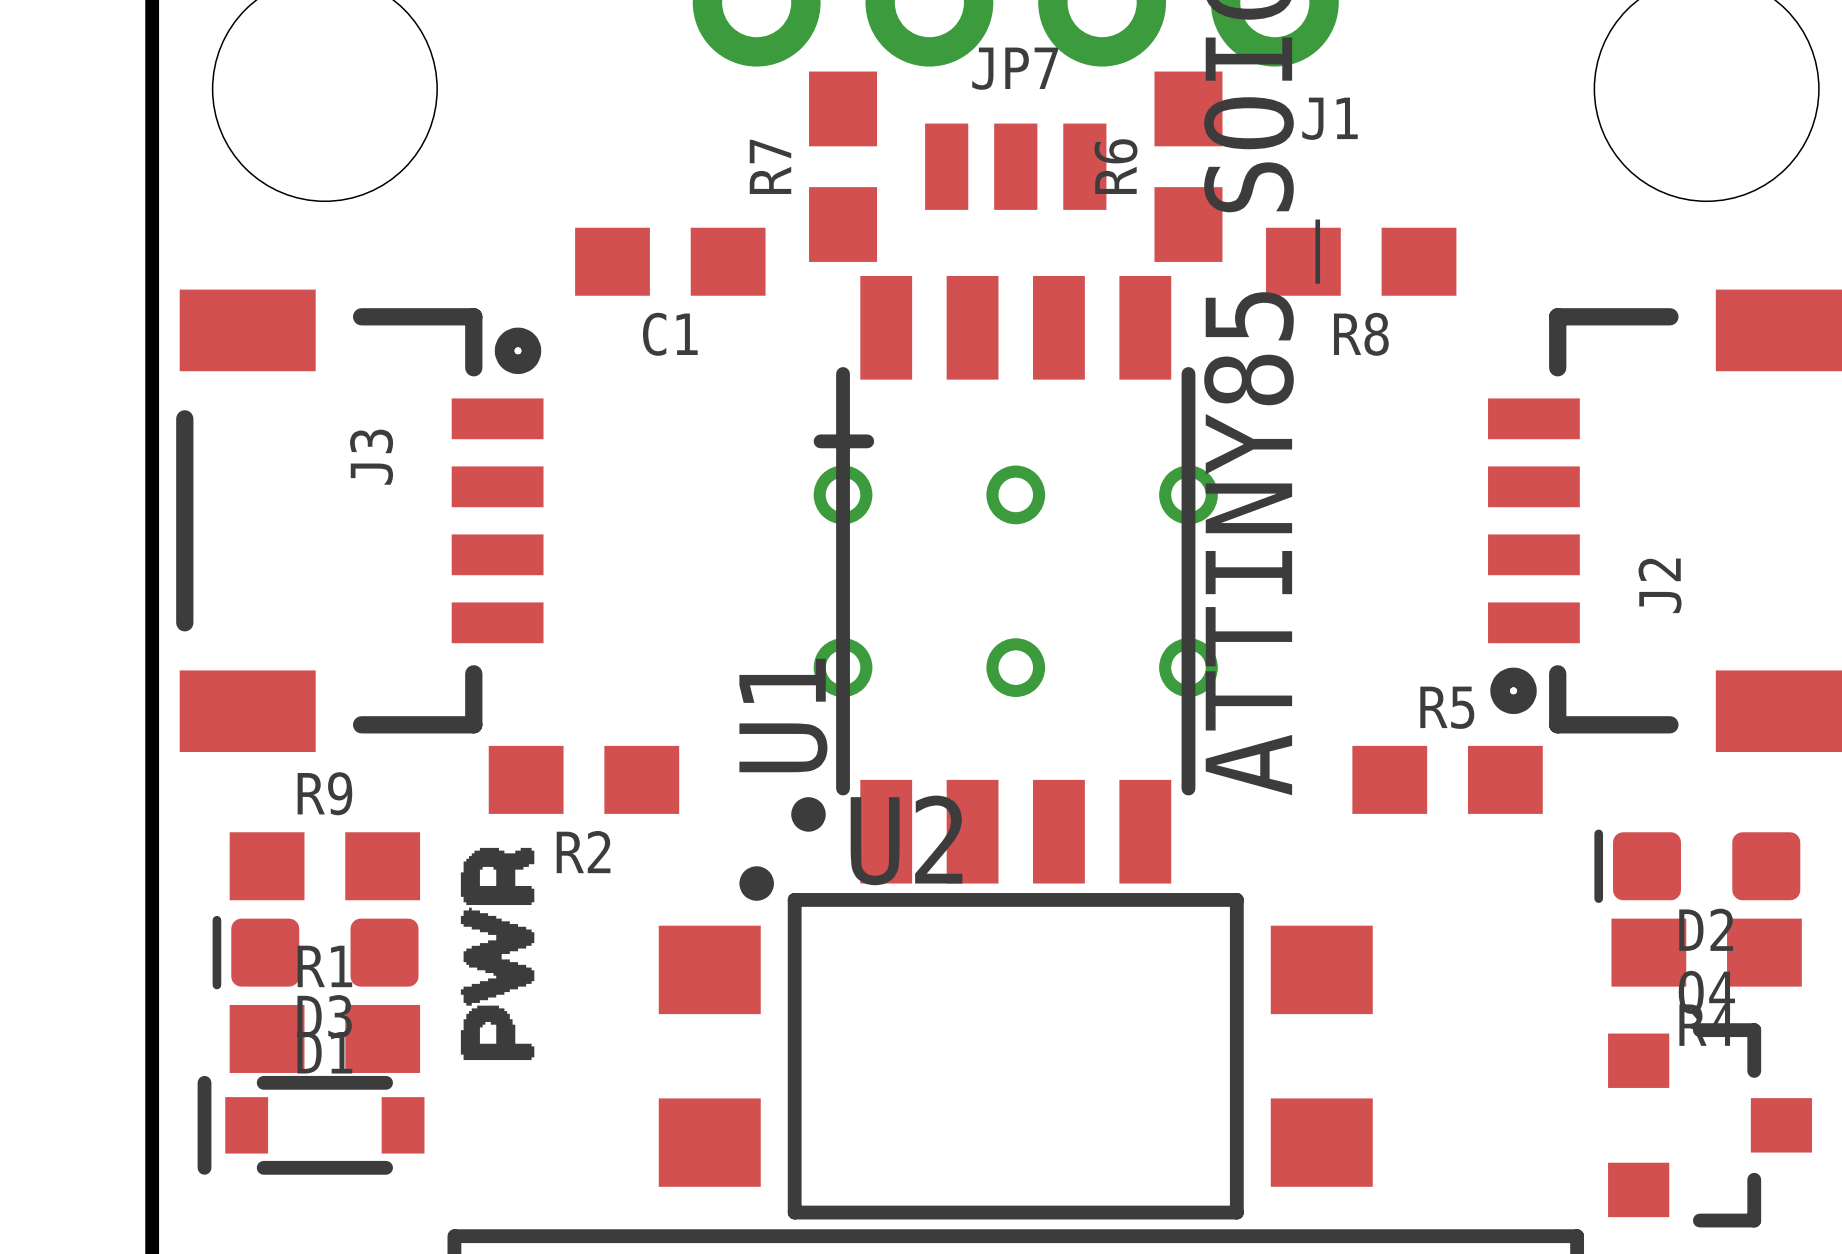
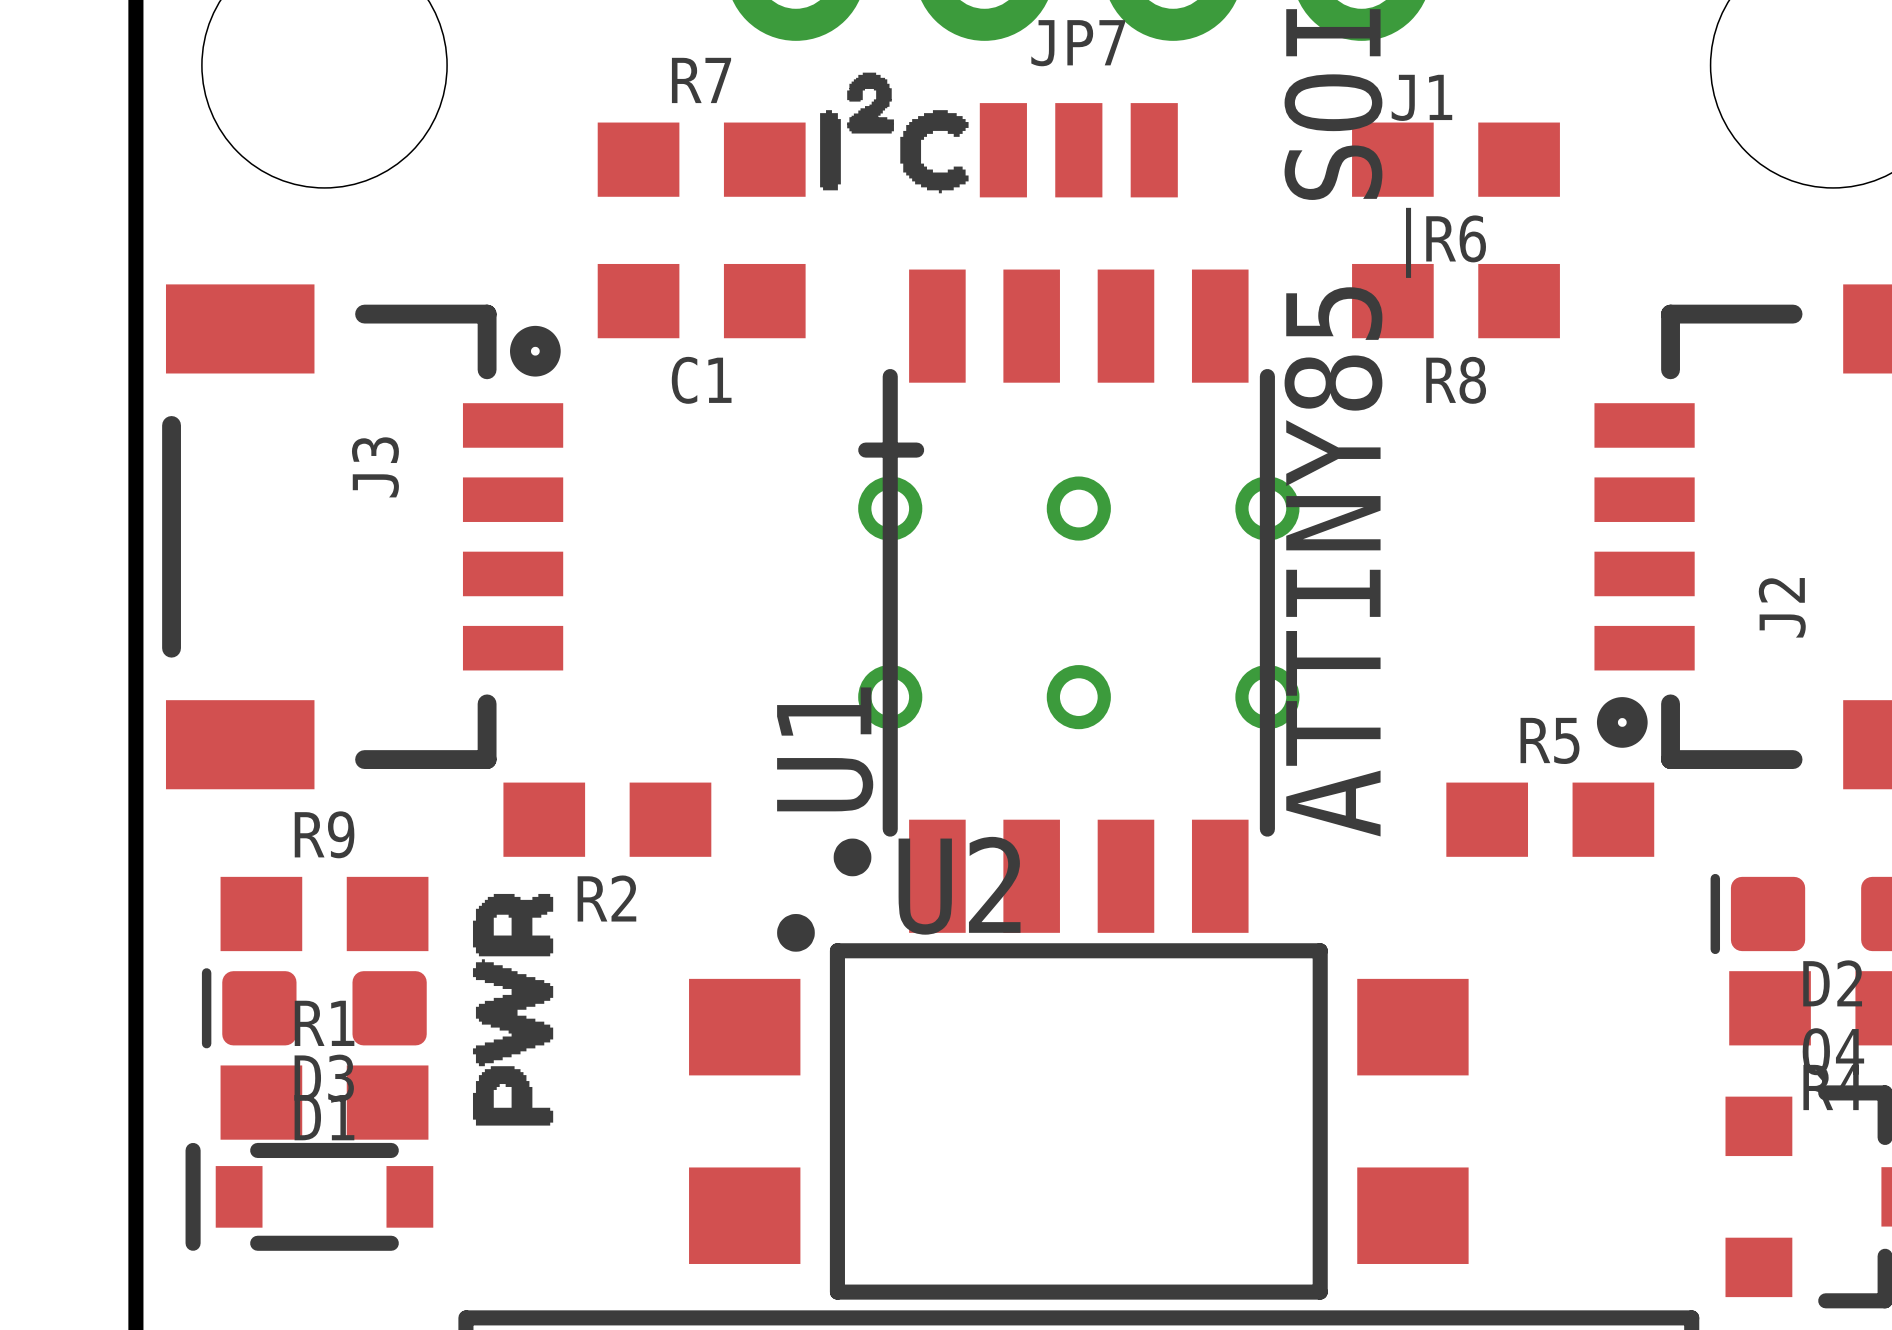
drawing: none -> [820, 72, 969, 194]
R7 rotation: 0° (843, 166) -> 90° clockwise (701, 159)
R7 position: (843, 166) -> (701, 159)
R6 rotation: 0° (1188, 166) -> 90° clockwise (1455, 159)
R6 position: (1188, 166) -> (1455, 159)
C1 position: (670, 261) -> (701, 301)
R8 position: (1361, 261) -> (1455, 301)

